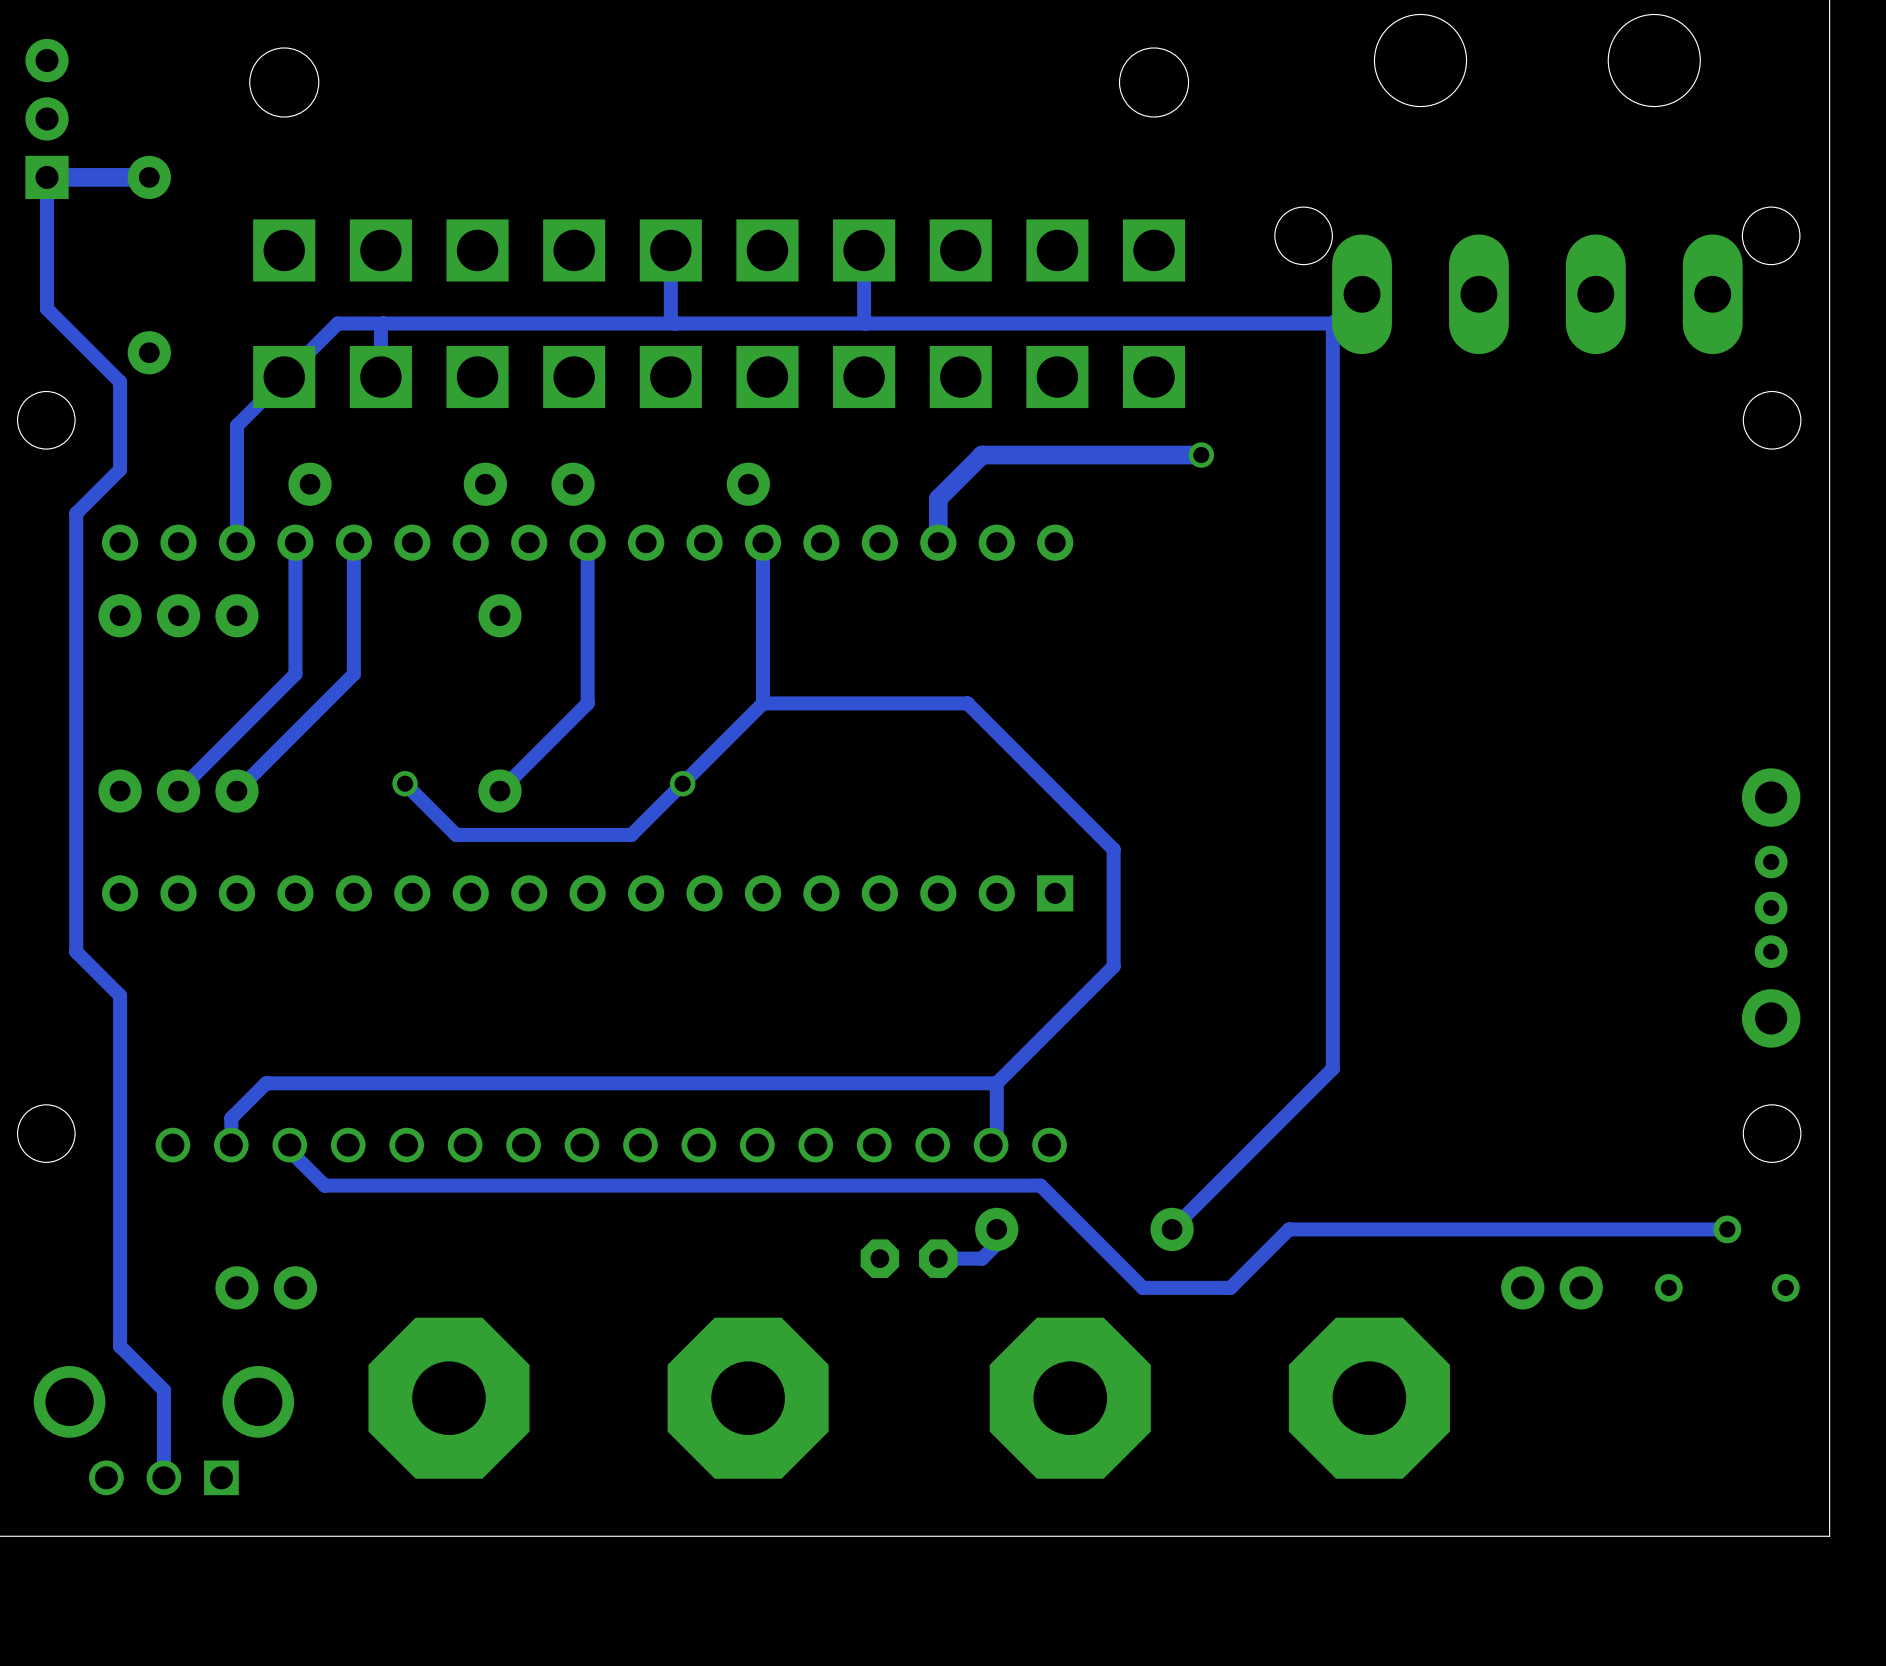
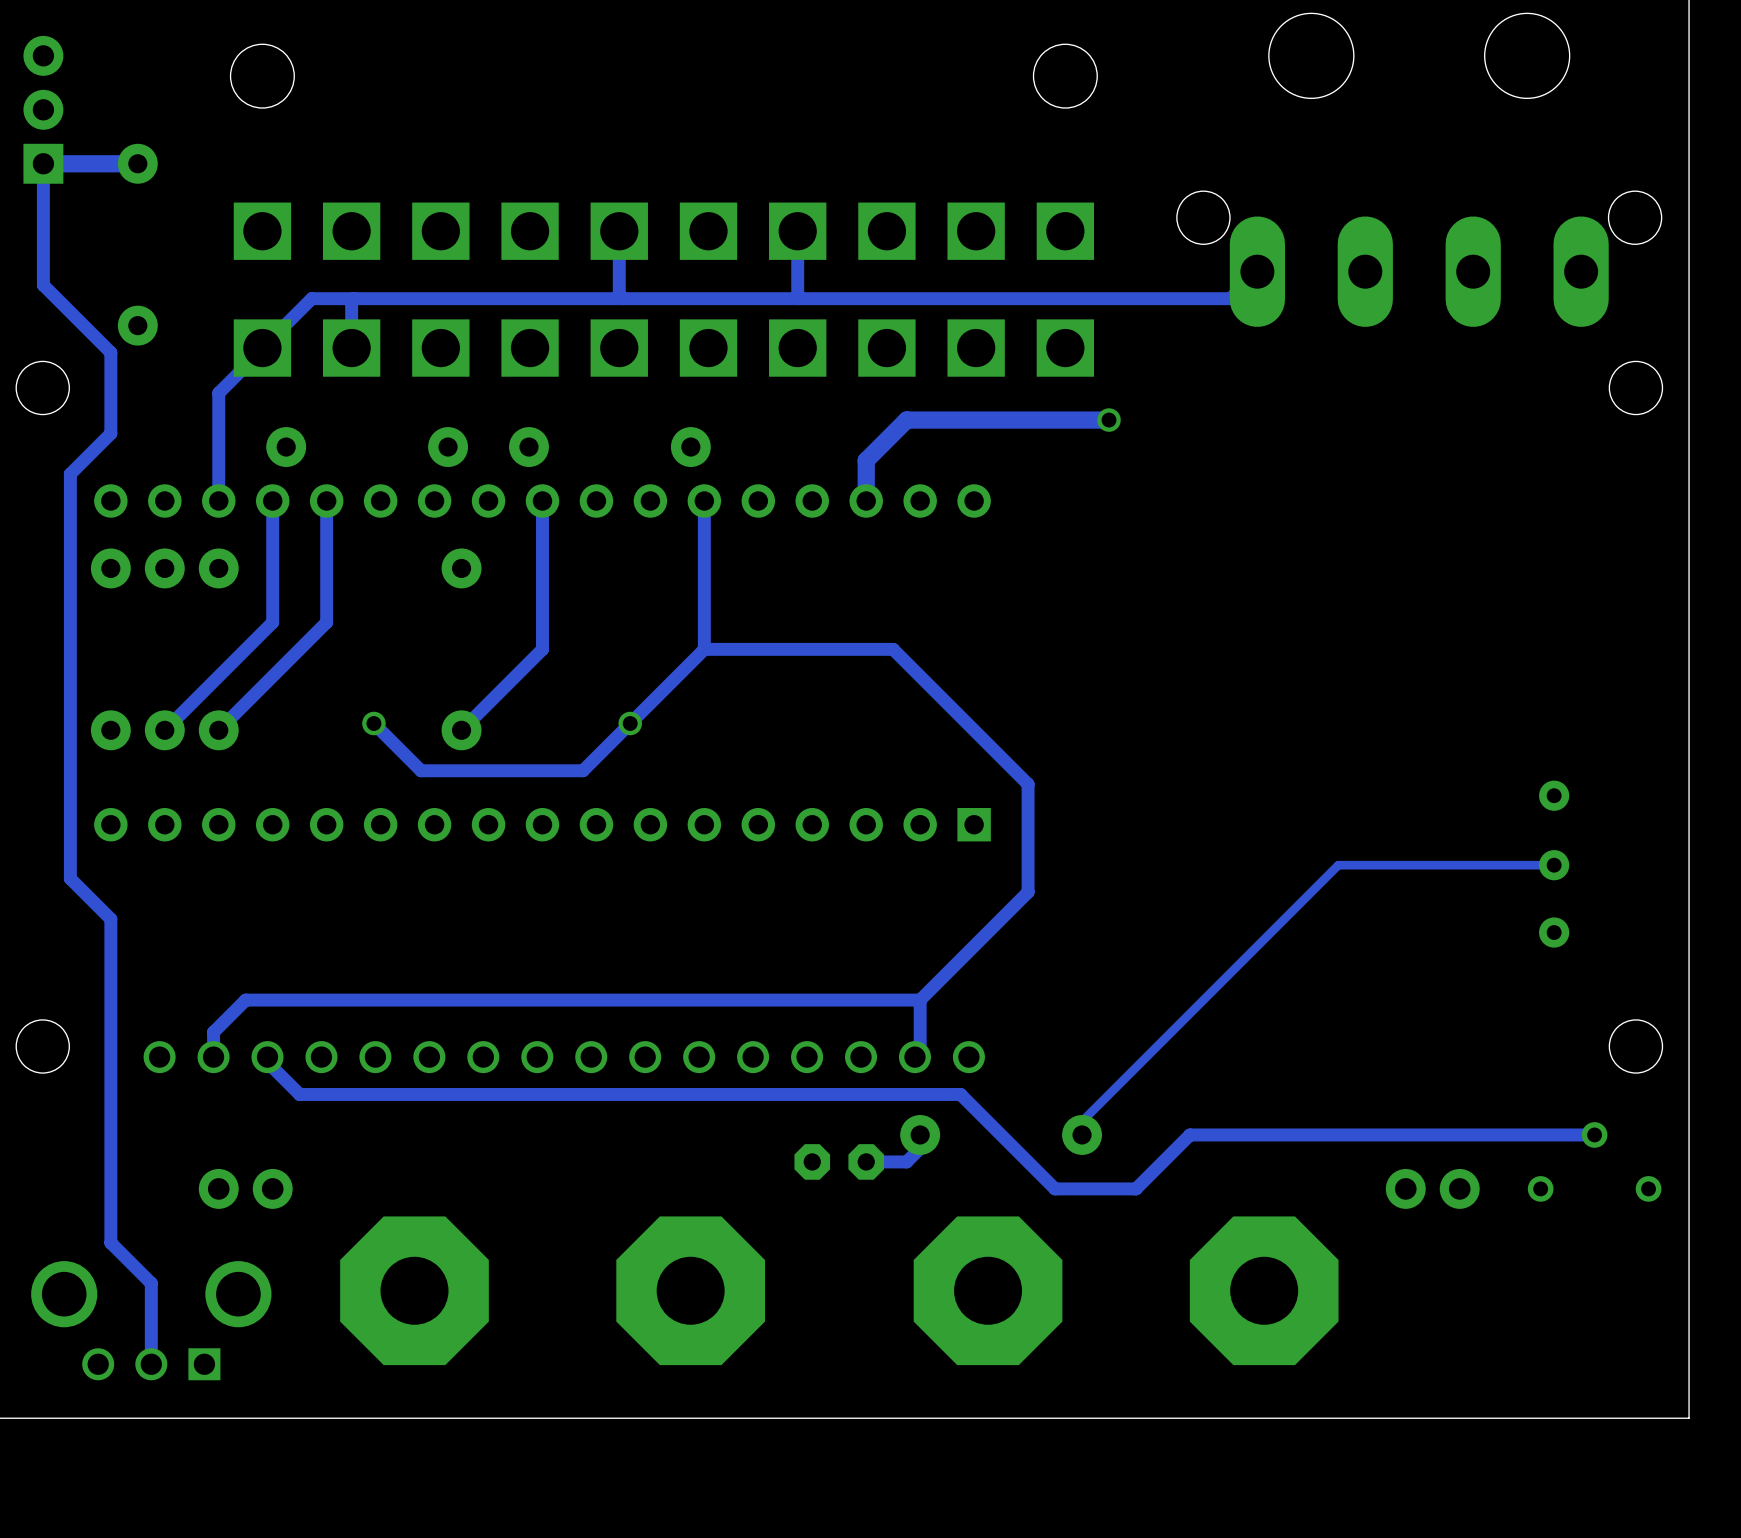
track: (1332, 323) (1332, 1068) (1172, 1229) -> (1554, 865) (1338, 865) (1082, 1121) (1082, 1134)
part: (1771, 907) -> none
part: none -> (1554, 864)

